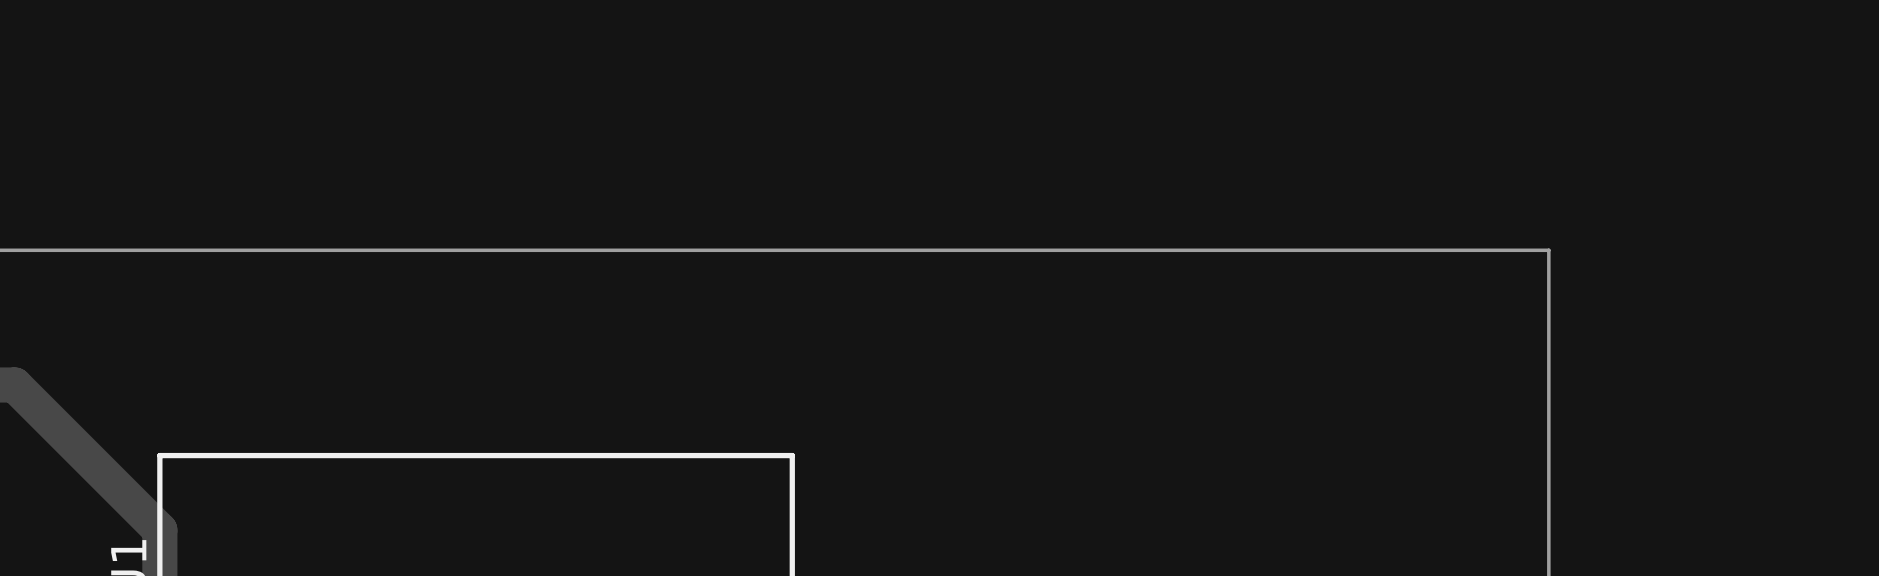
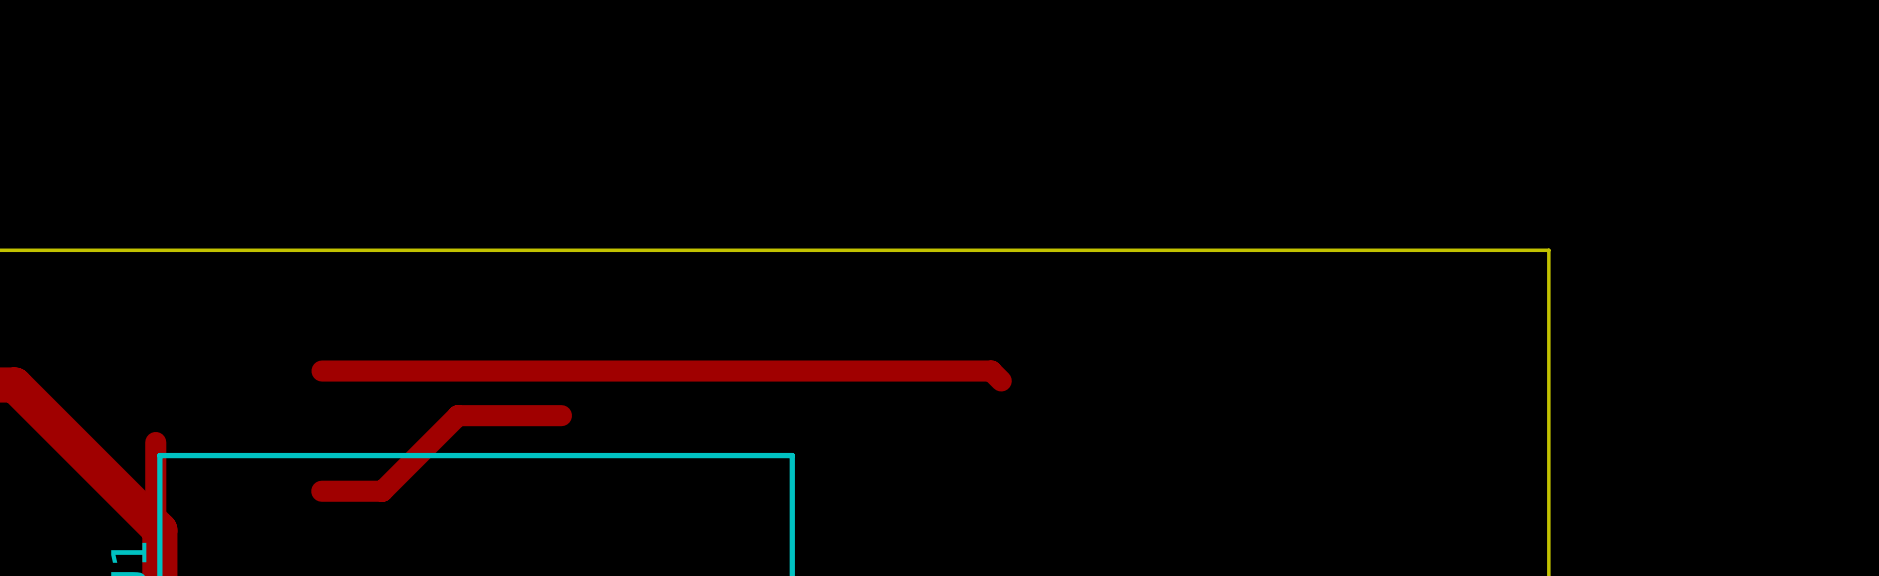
track: none -> (322, 371) (991, 371) (1001, 380)
track: none -> (561, 415) (458, 415) (382, 491) (321, 491)
track: none -> (155, 442) (156, 550)

